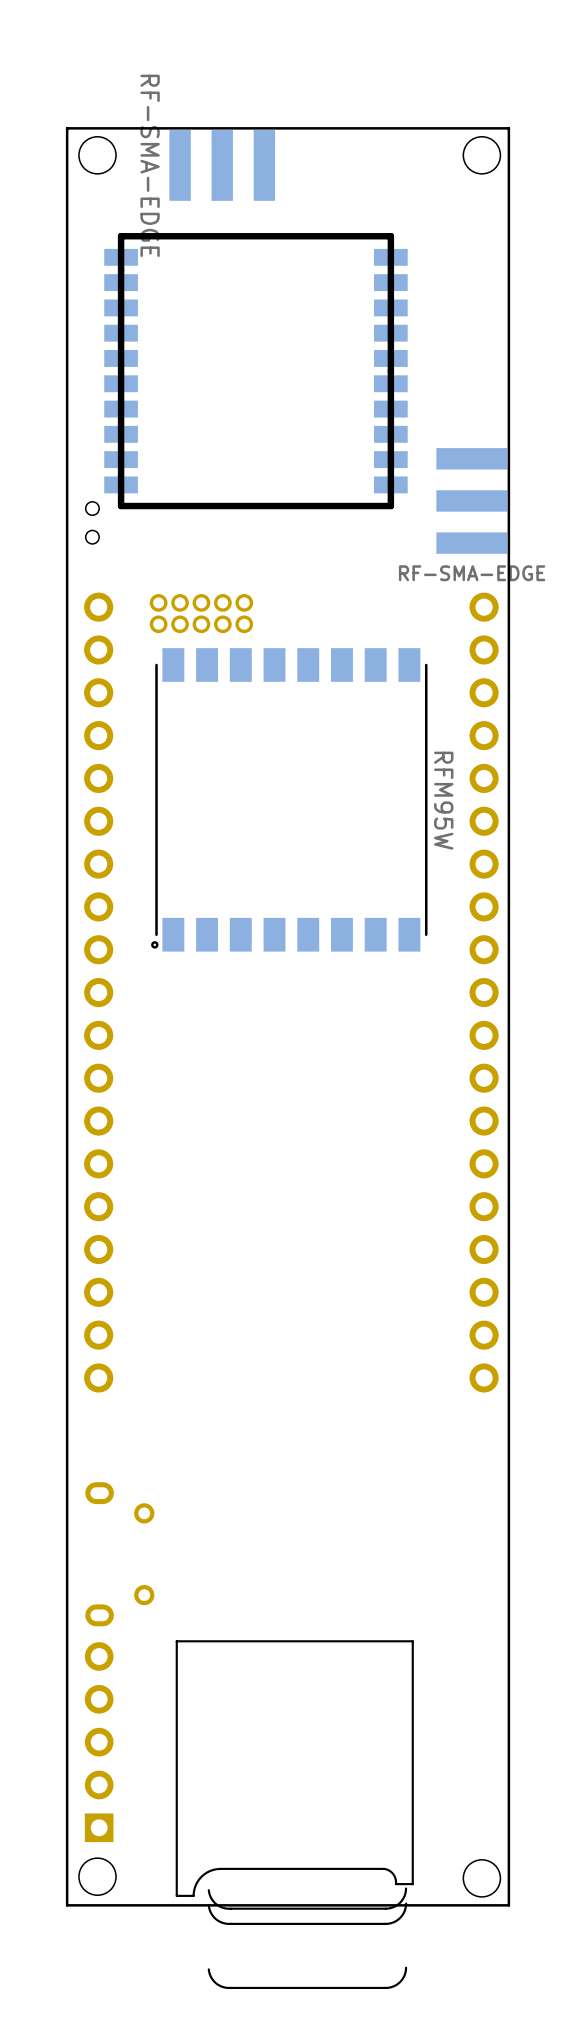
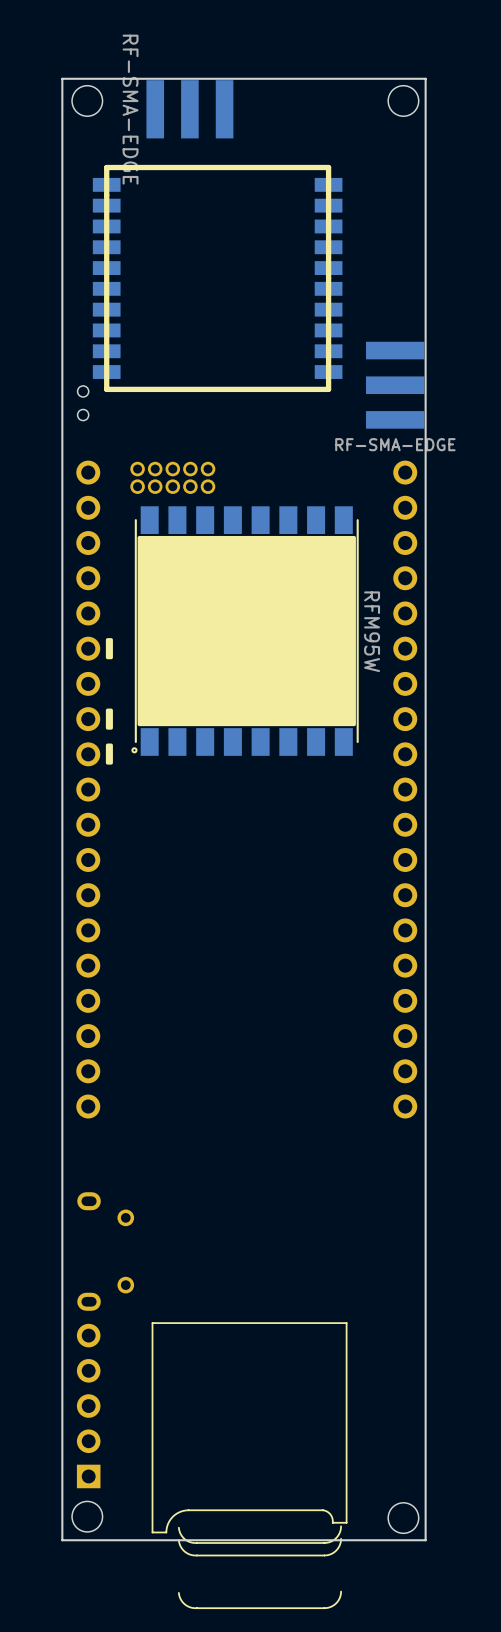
drawing: none -> [137, 535, 356, 727]
drawing: none -> [105, 638, 113, 660]
drawing: none -> [105, 708, 113, 765]

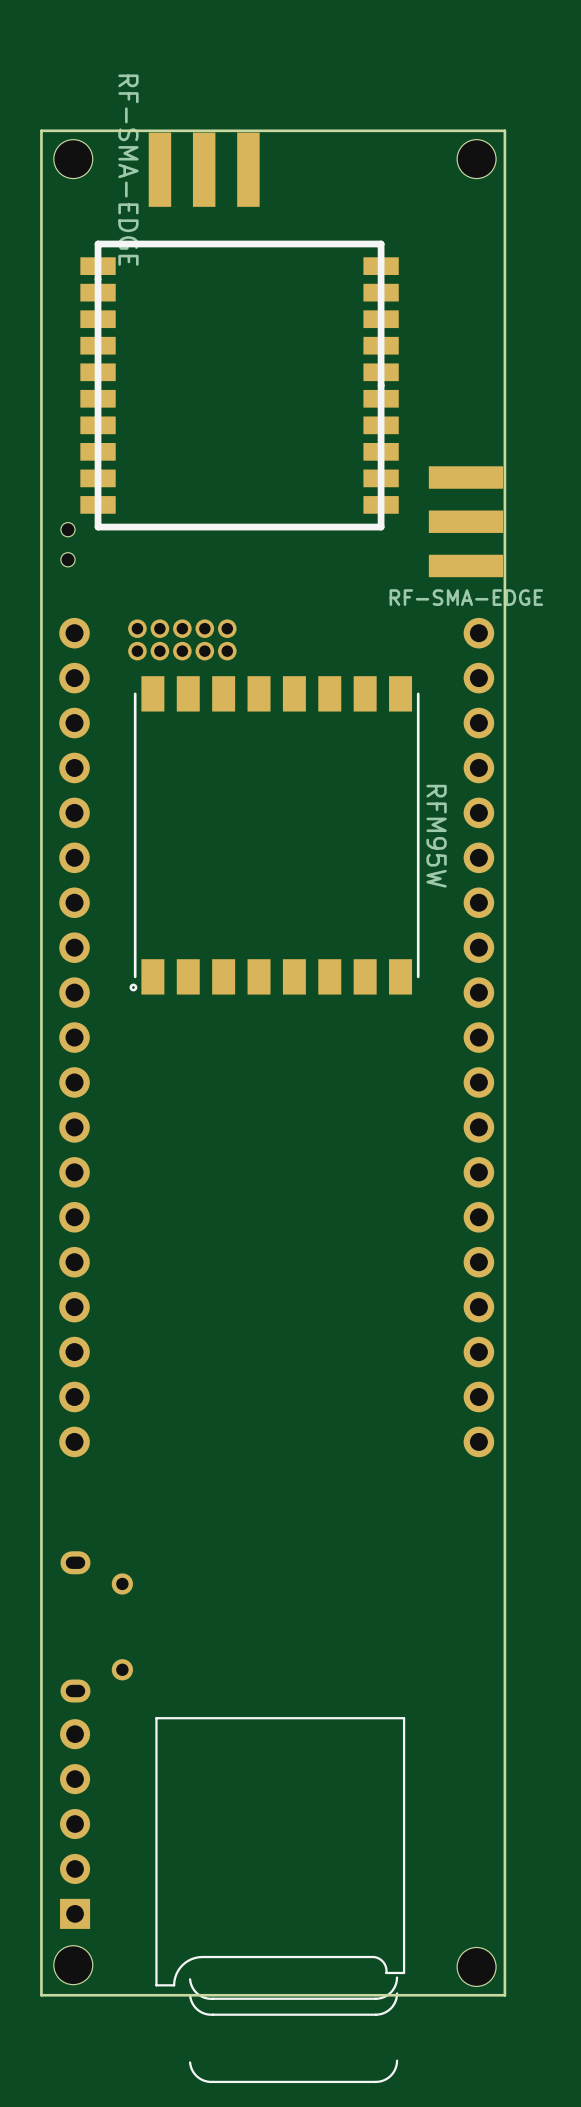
drawing: [137, 535, 356, 727] -> none
drawing: [105, 638, 113, 660] -> none
drawing: [105, 708, 113, 765] -> none

